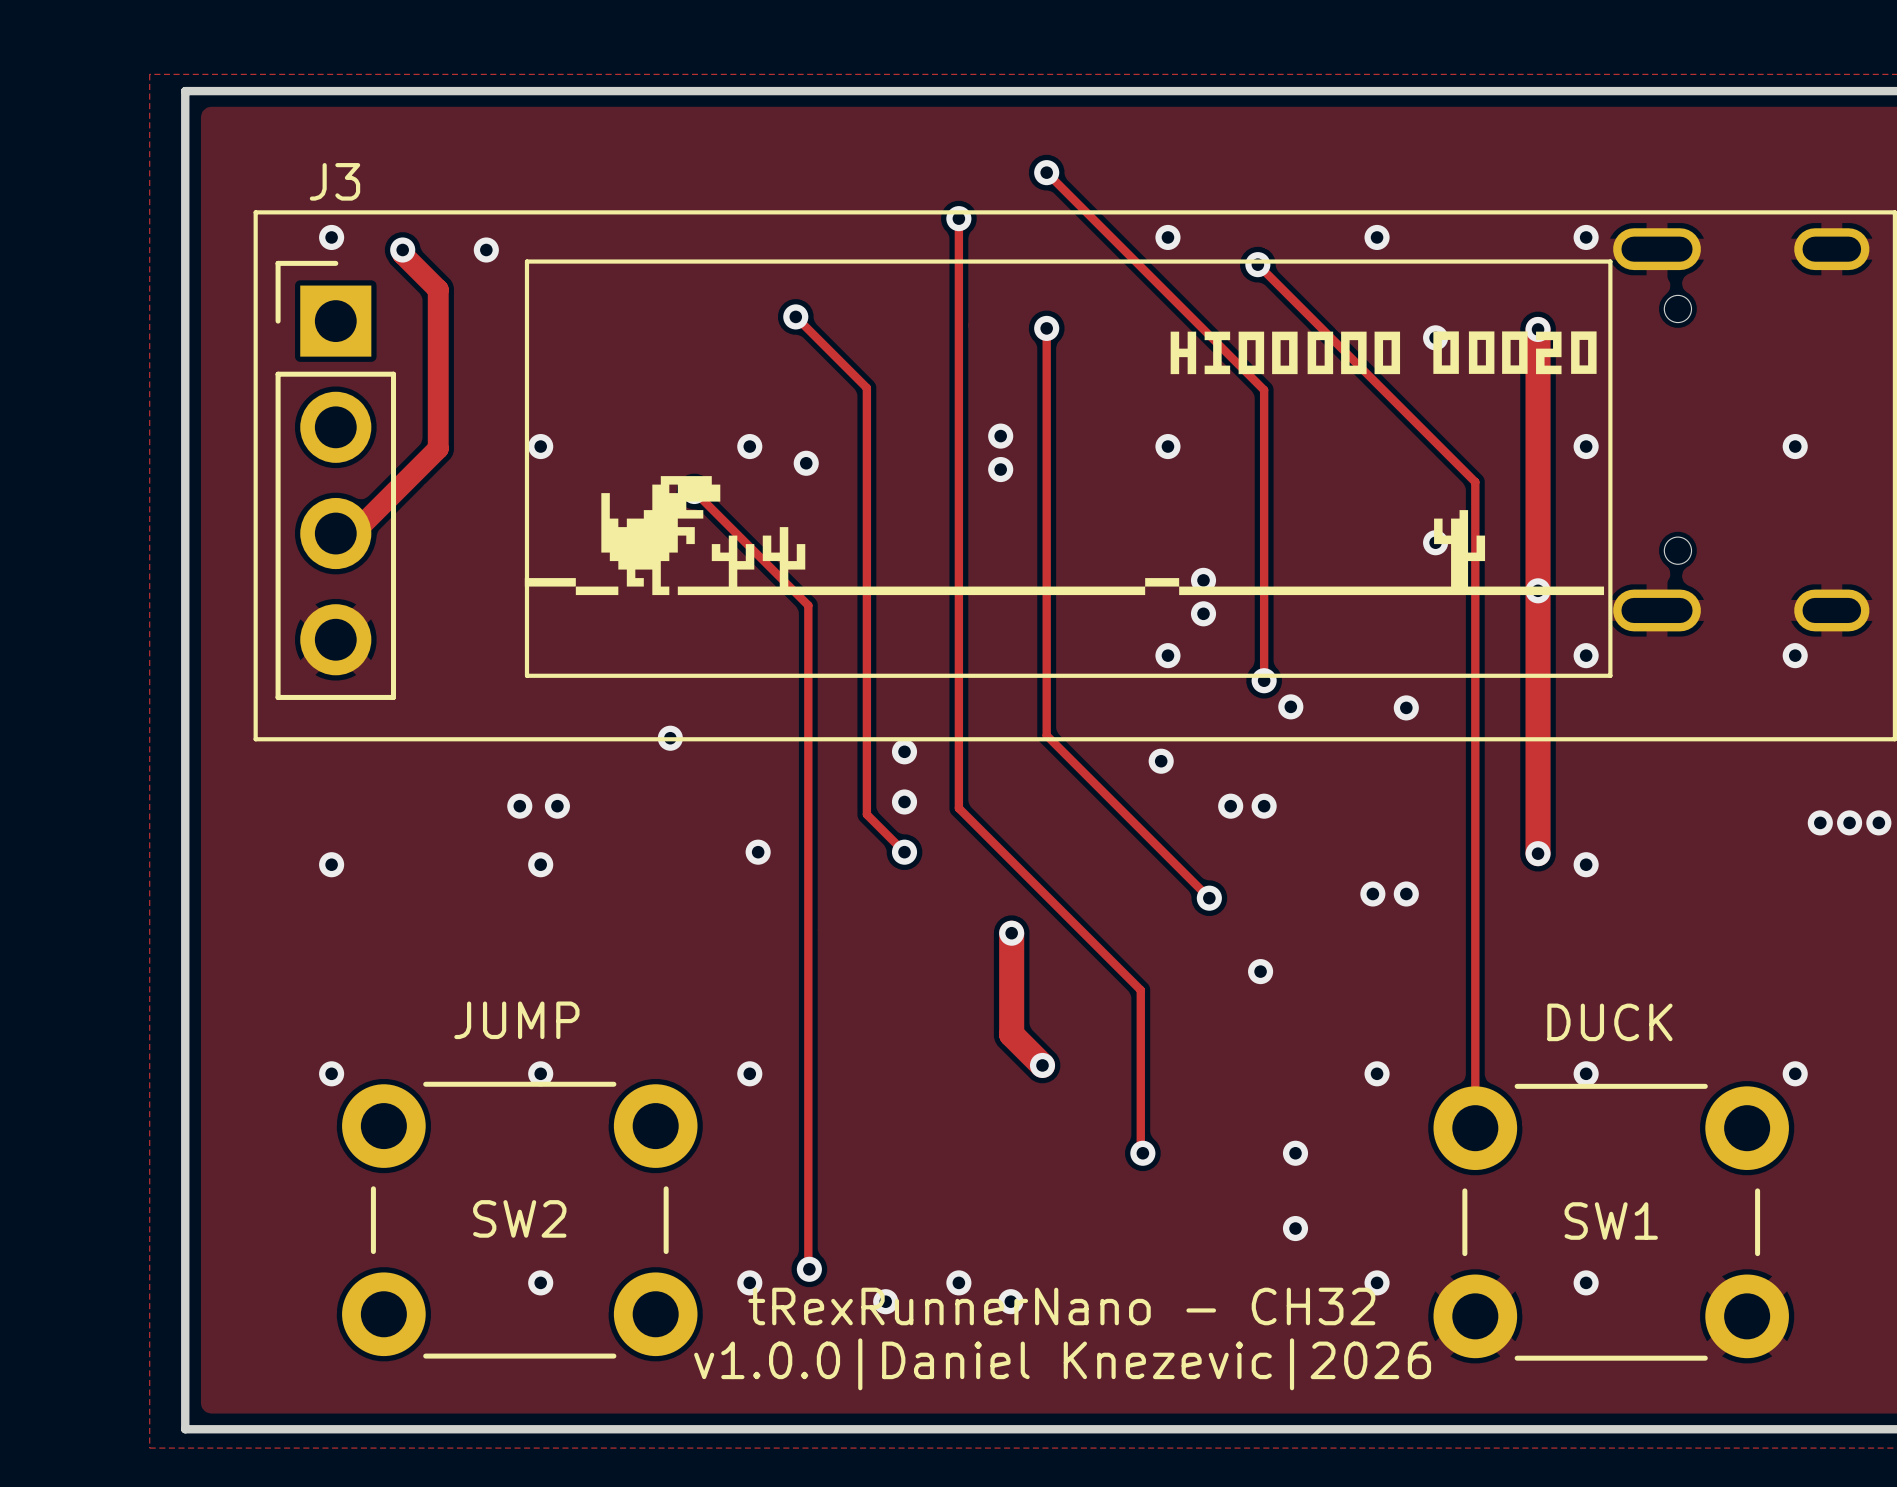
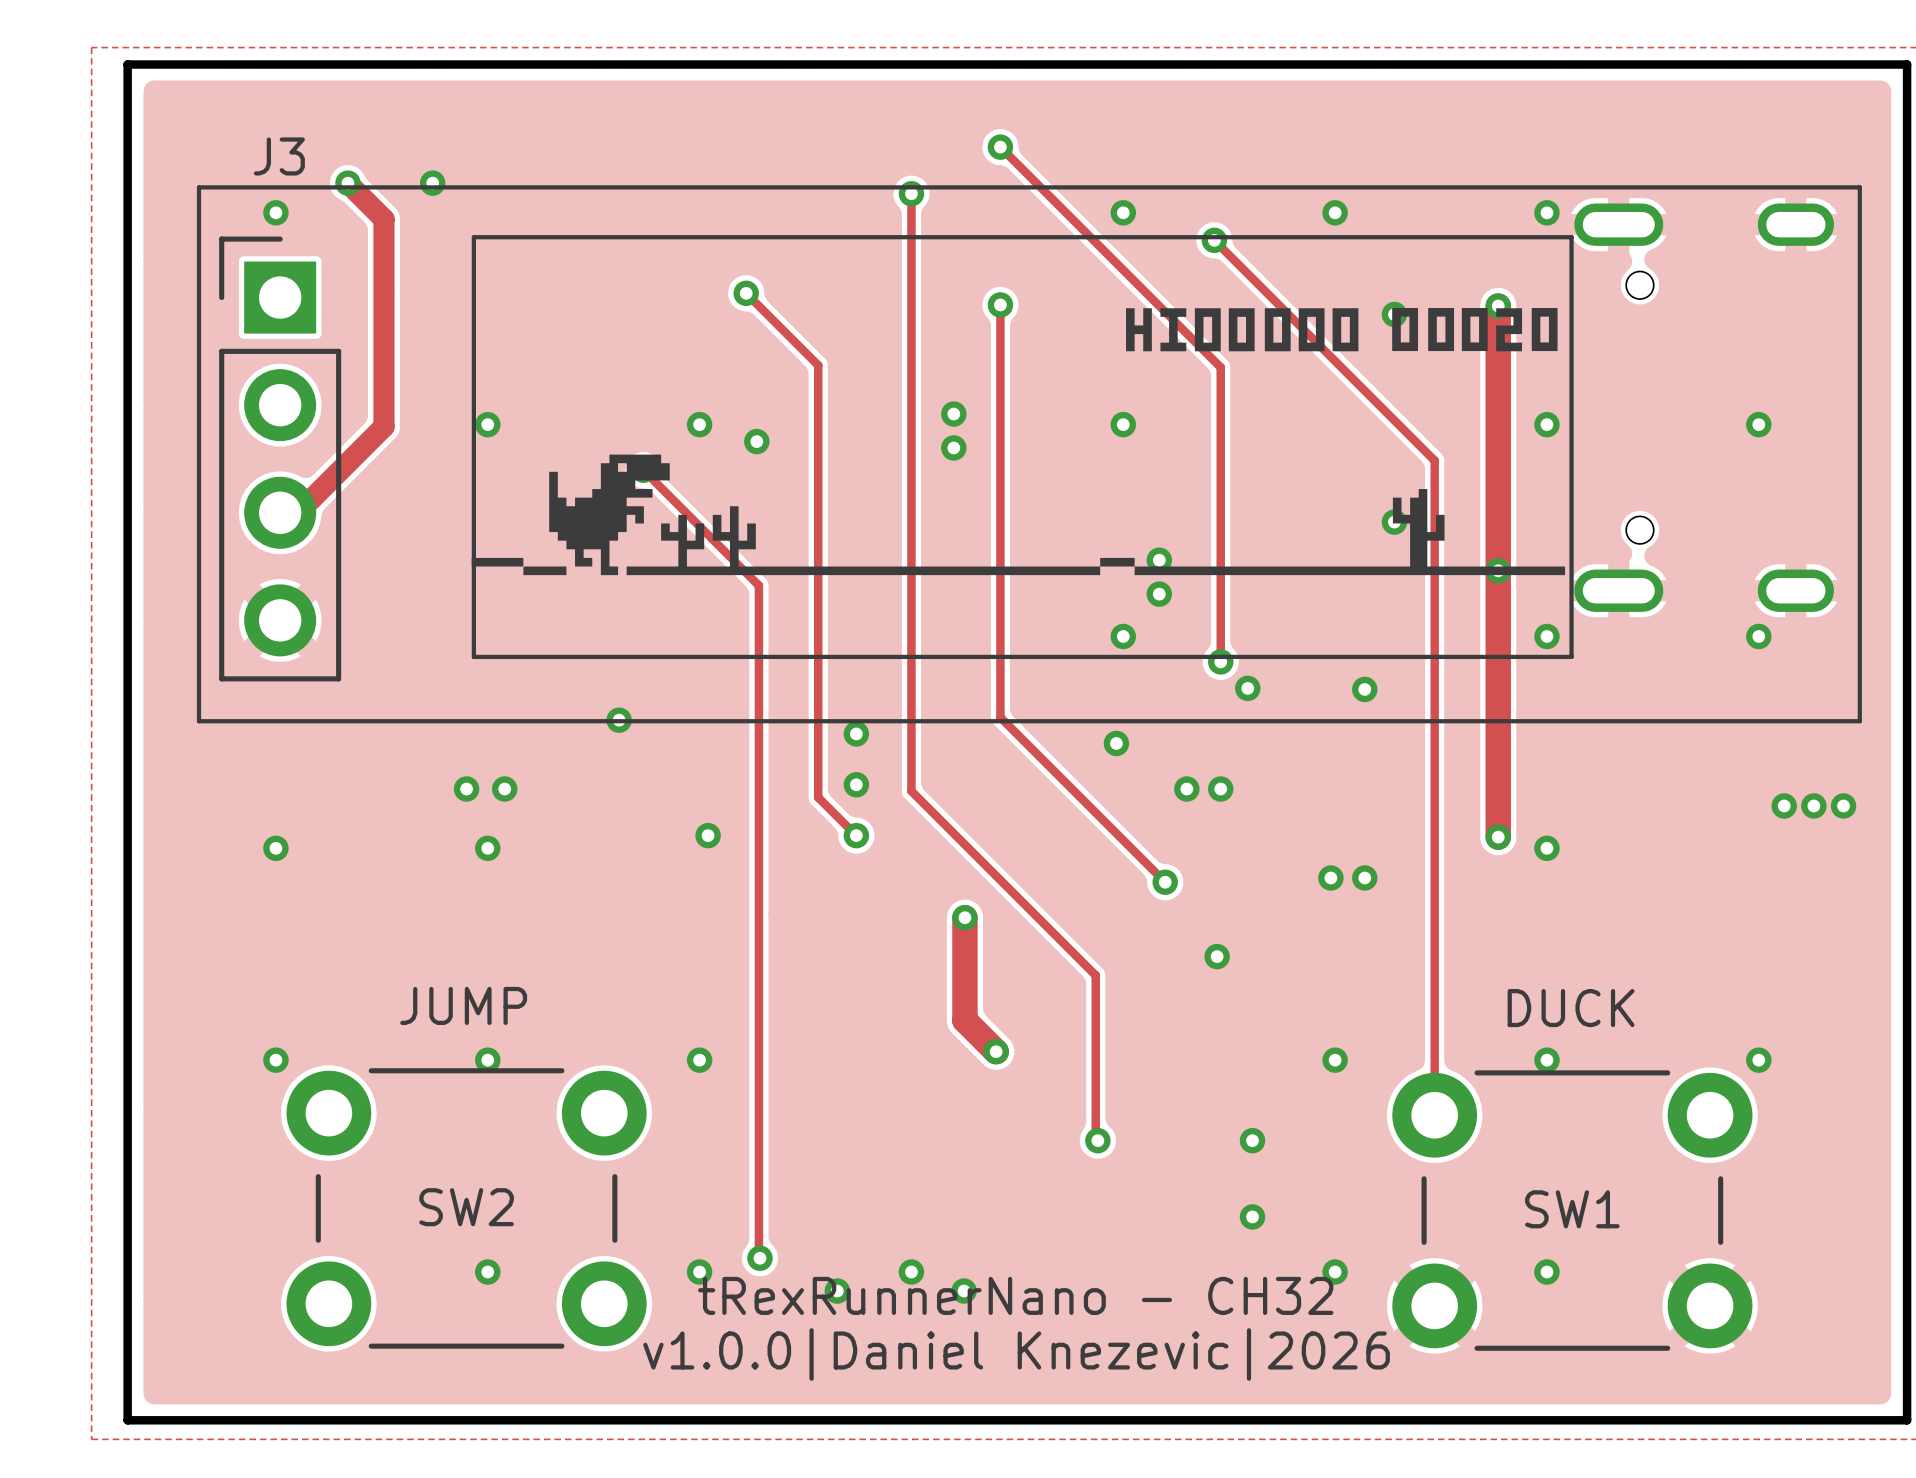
track: (402, 250) (402, 254) (438, 289) -> (347, 183) (383, 219) (383, 265)
via position: (402, 250) -> (347, 183)
via position: (486, 250) -> (432, 183)

